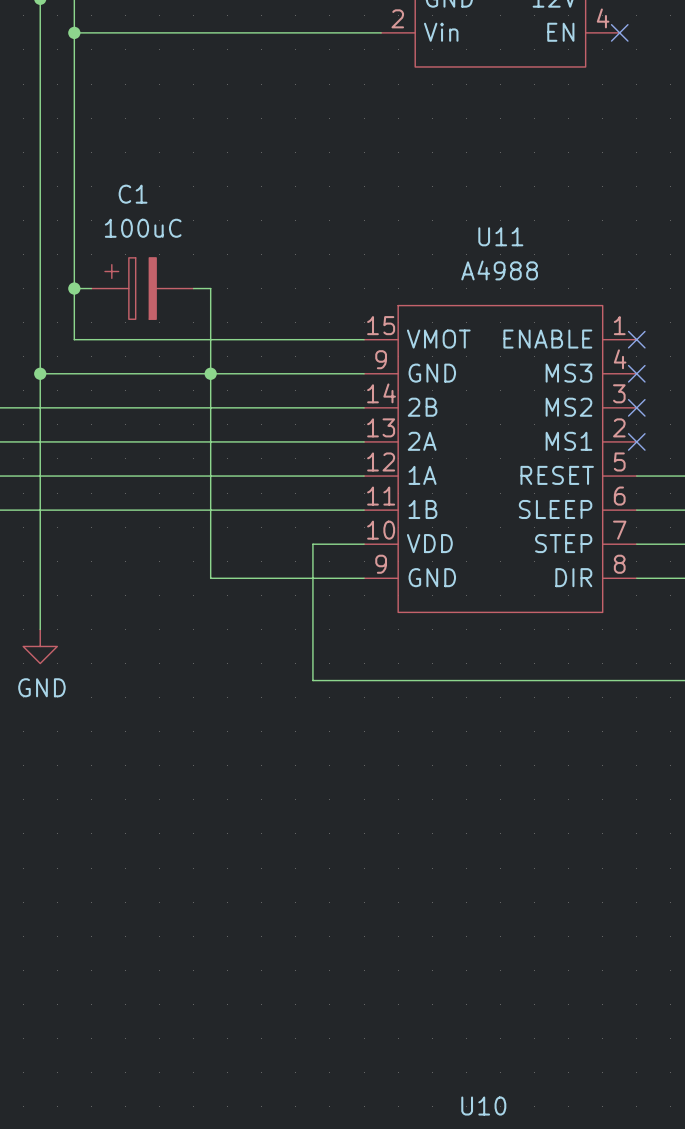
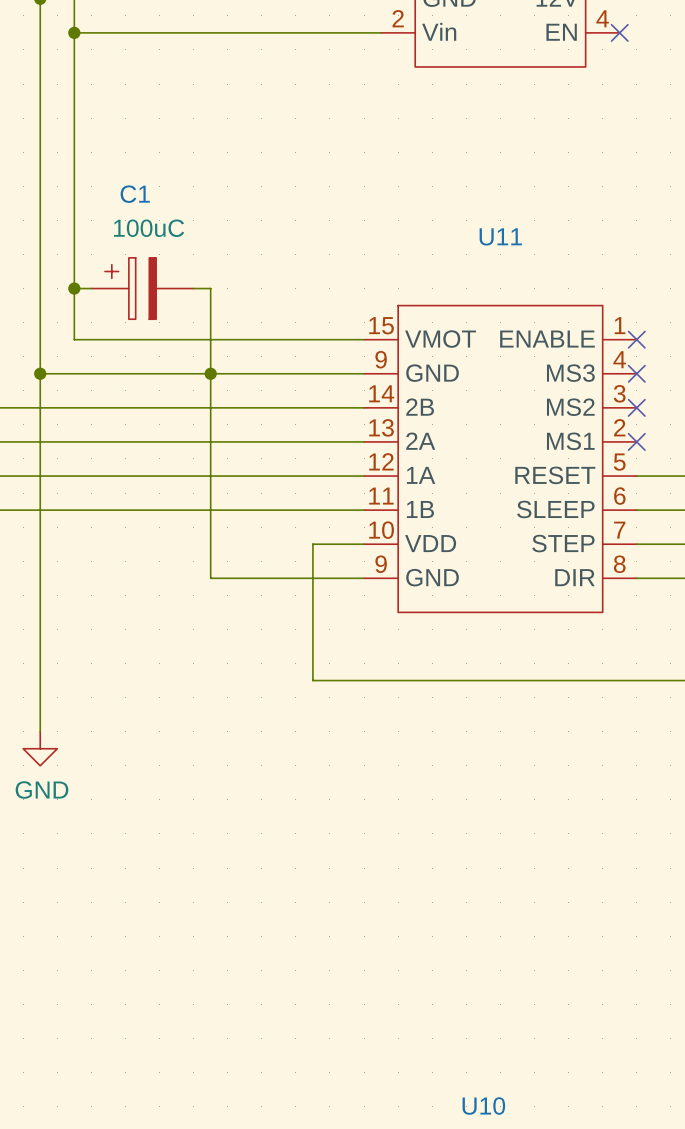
U11 value: A4988 (499, 270) -> none
wire: none -> (40, 629) (40, 731)
power symbol position: GND (40, 646) -> GND (40, 748)

